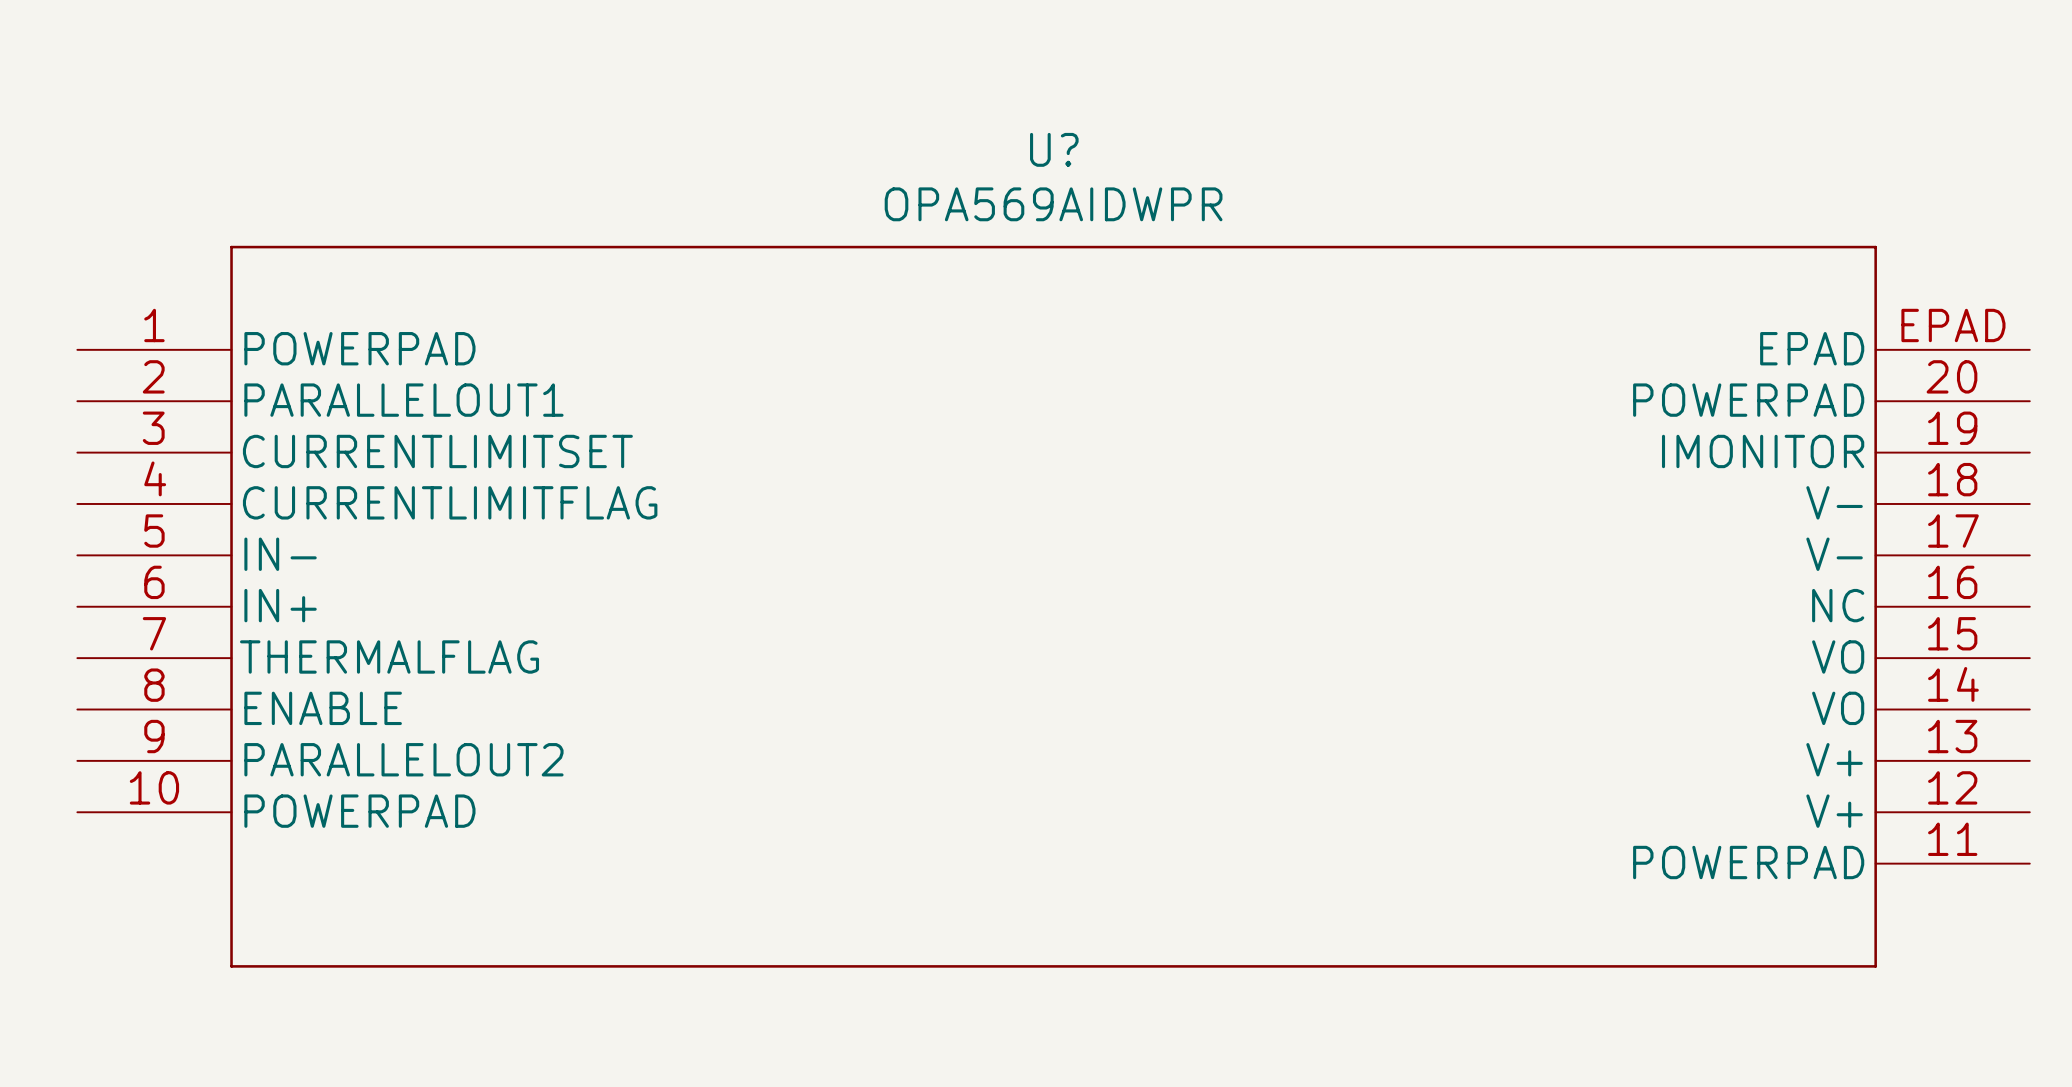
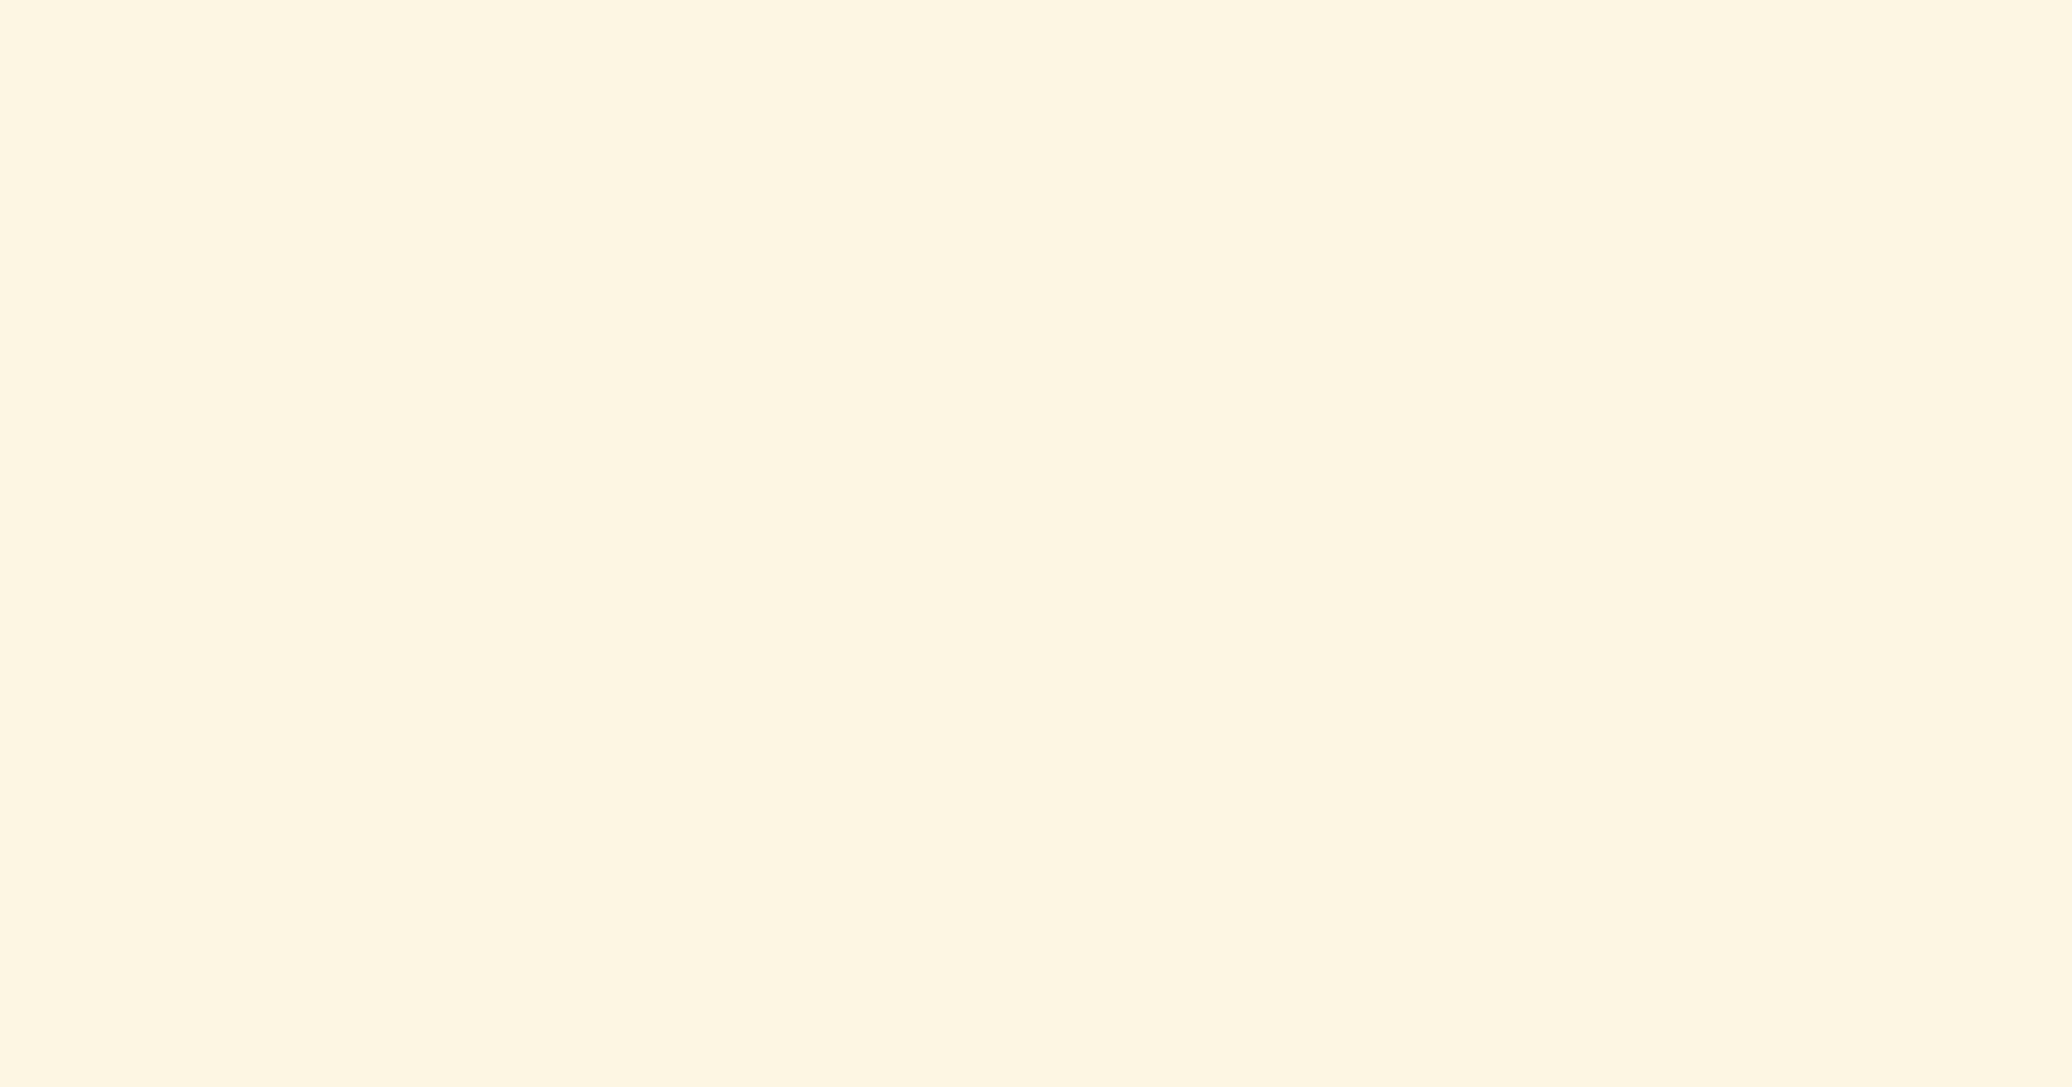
U?: OPA569AIDWPR (1053, 606) -> none

